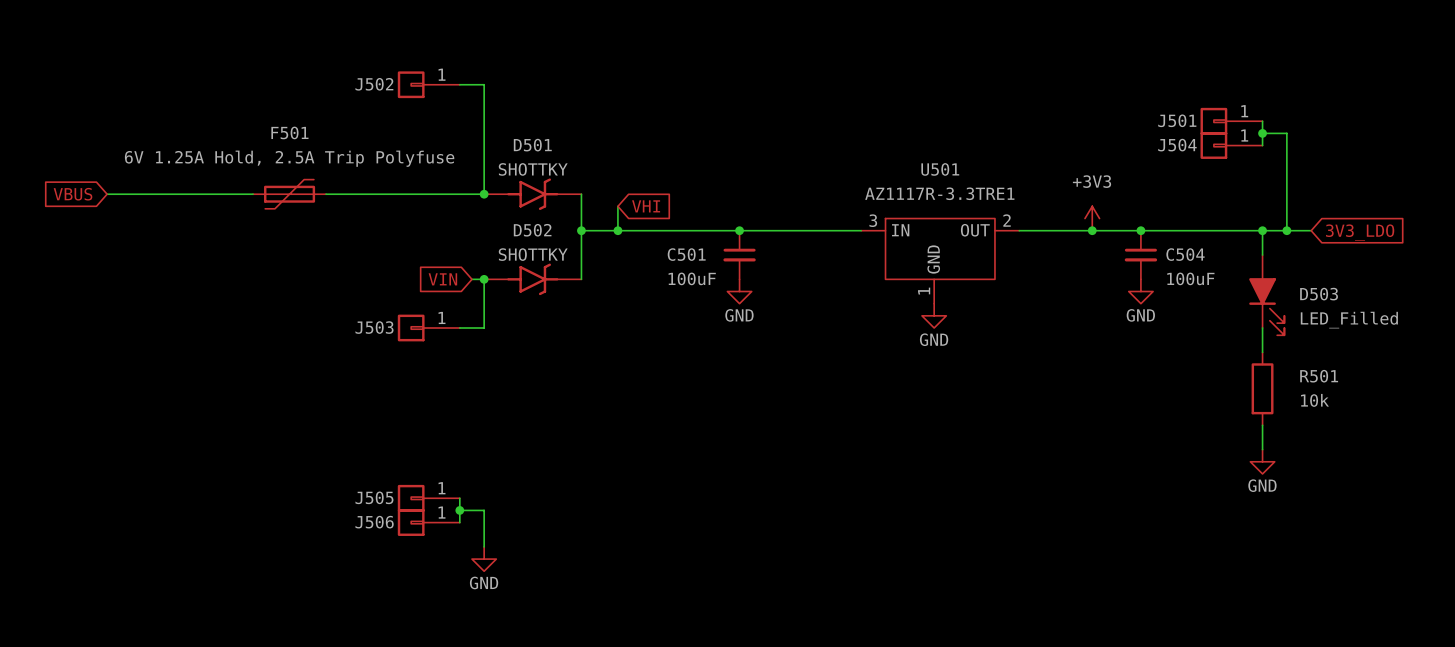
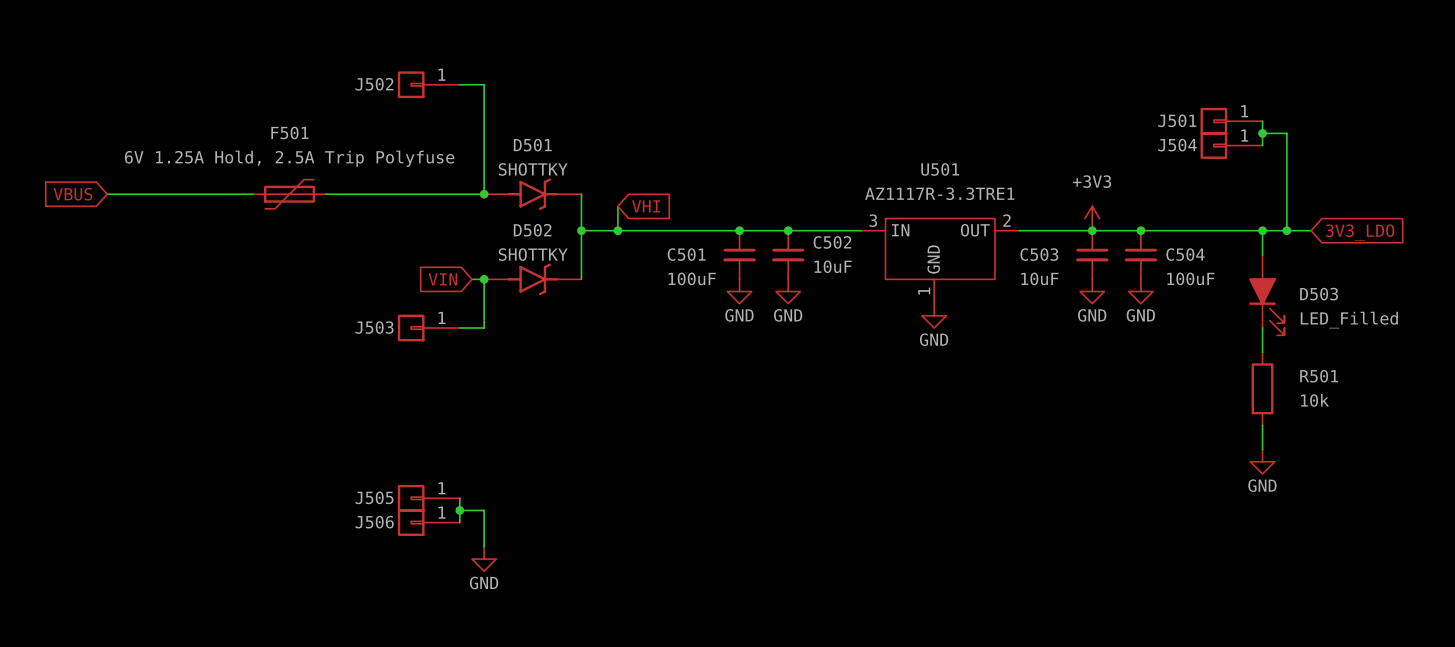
junction: none -> (788, 230)
C502: none -> 10uF (788, 255)
C503: none -> 10uF (1092, 255)
power symbol: none -> GND (788, 291)
power symbol: none -> GND (1092, 291)

